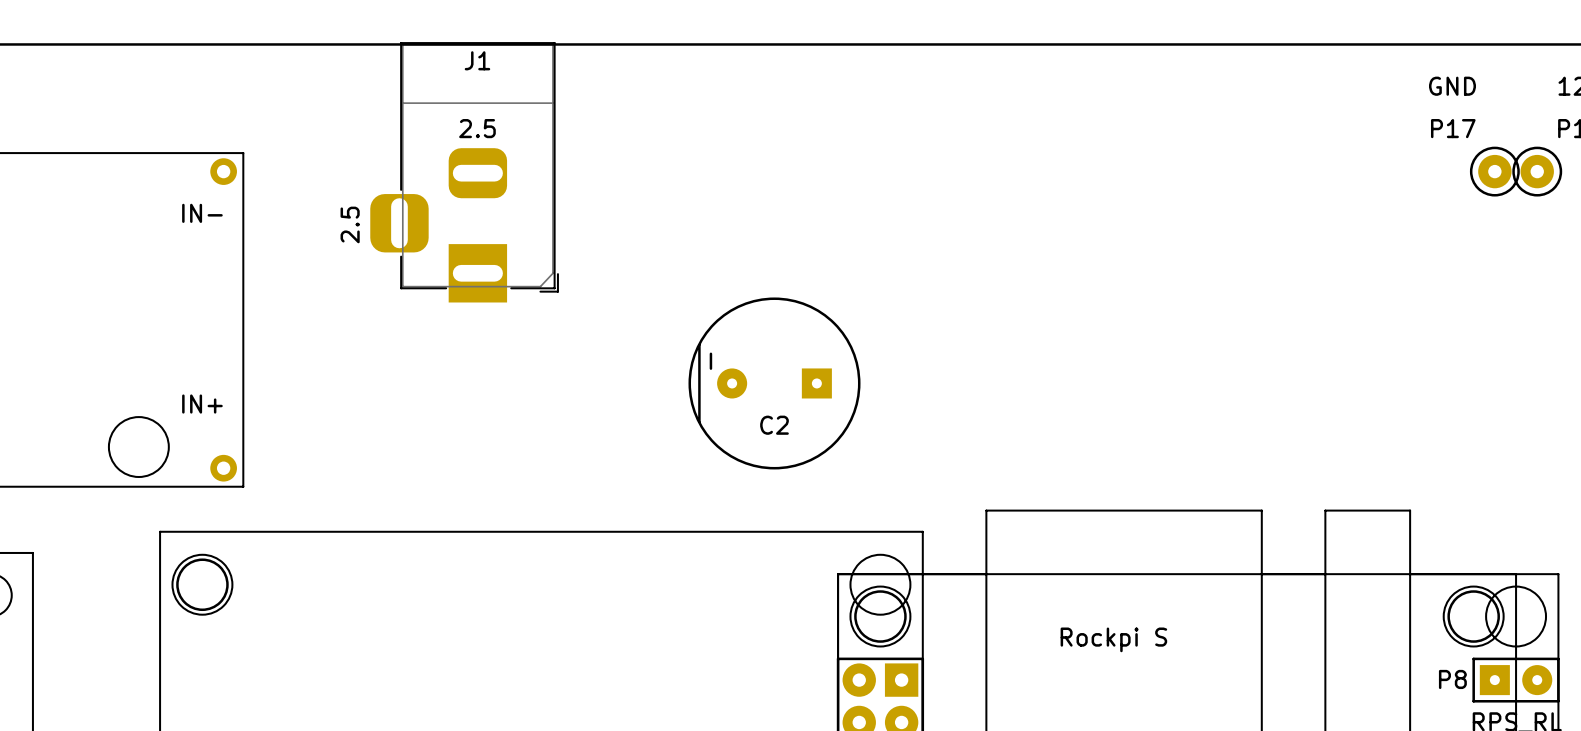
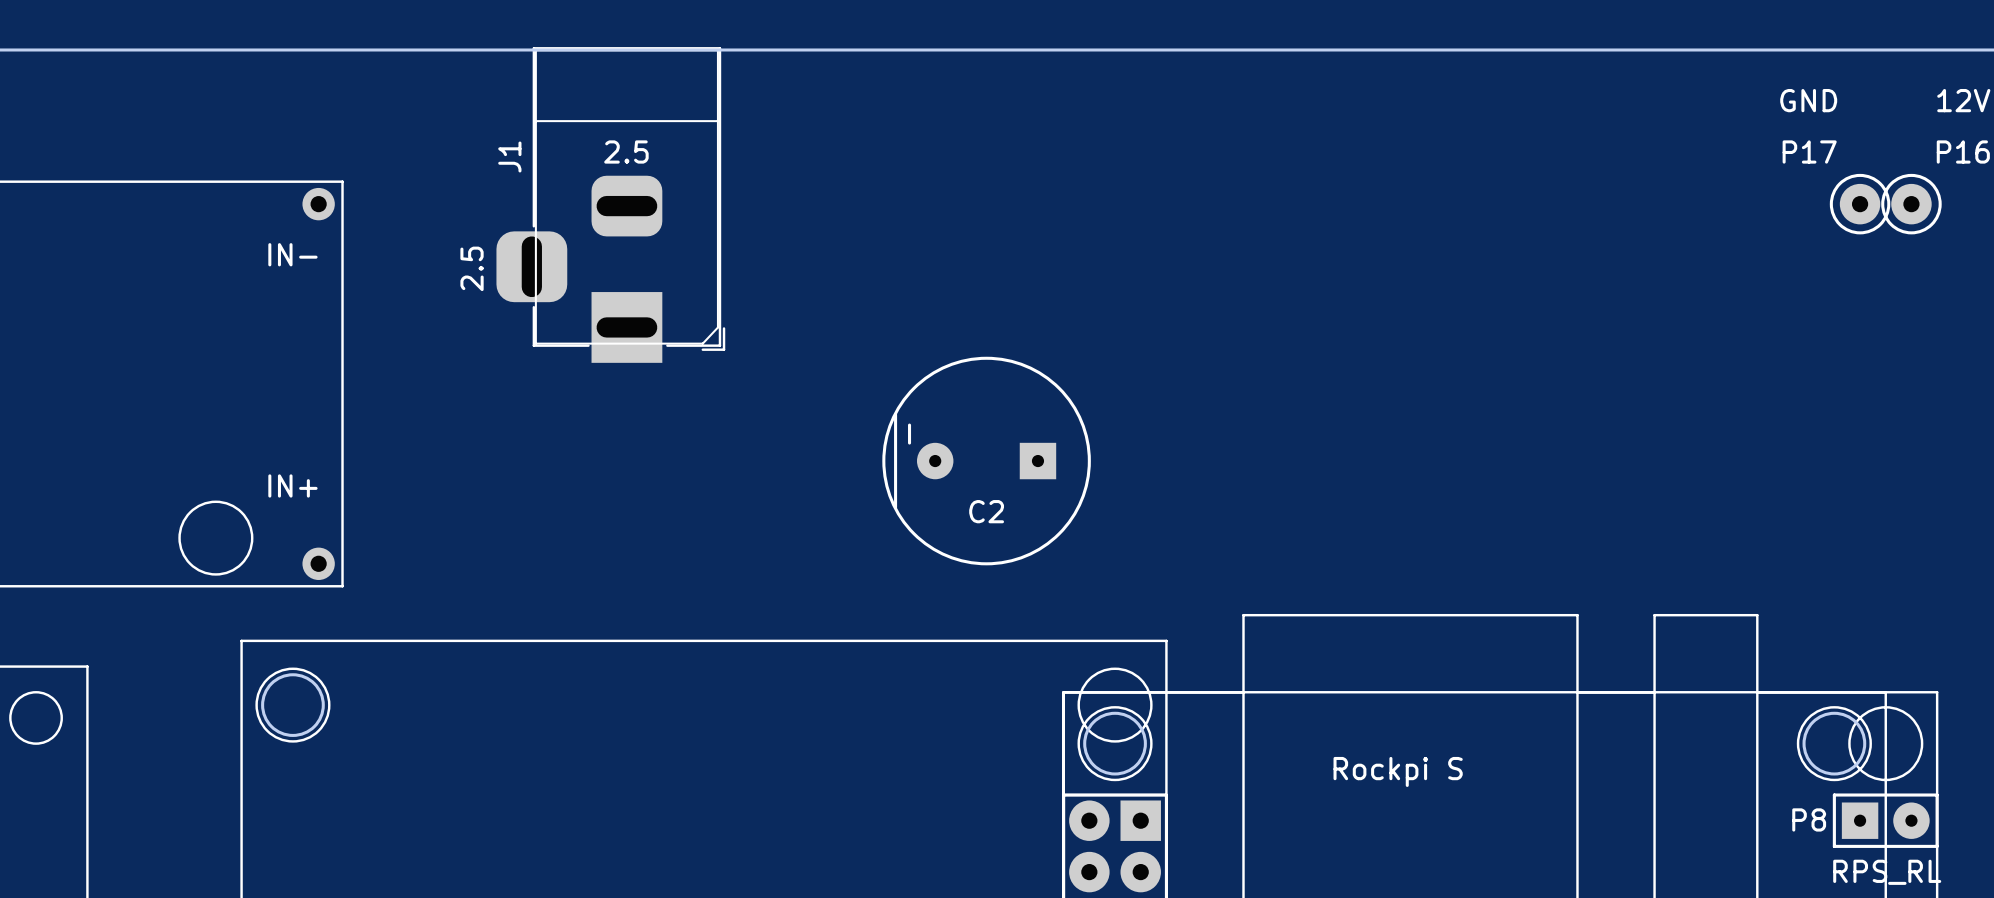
J1 footprint: [370, 42, 559, 303] -> [496, 47, 726, 363]
J1 name position: J1 (477, 60) -> J1 (509, 157)

